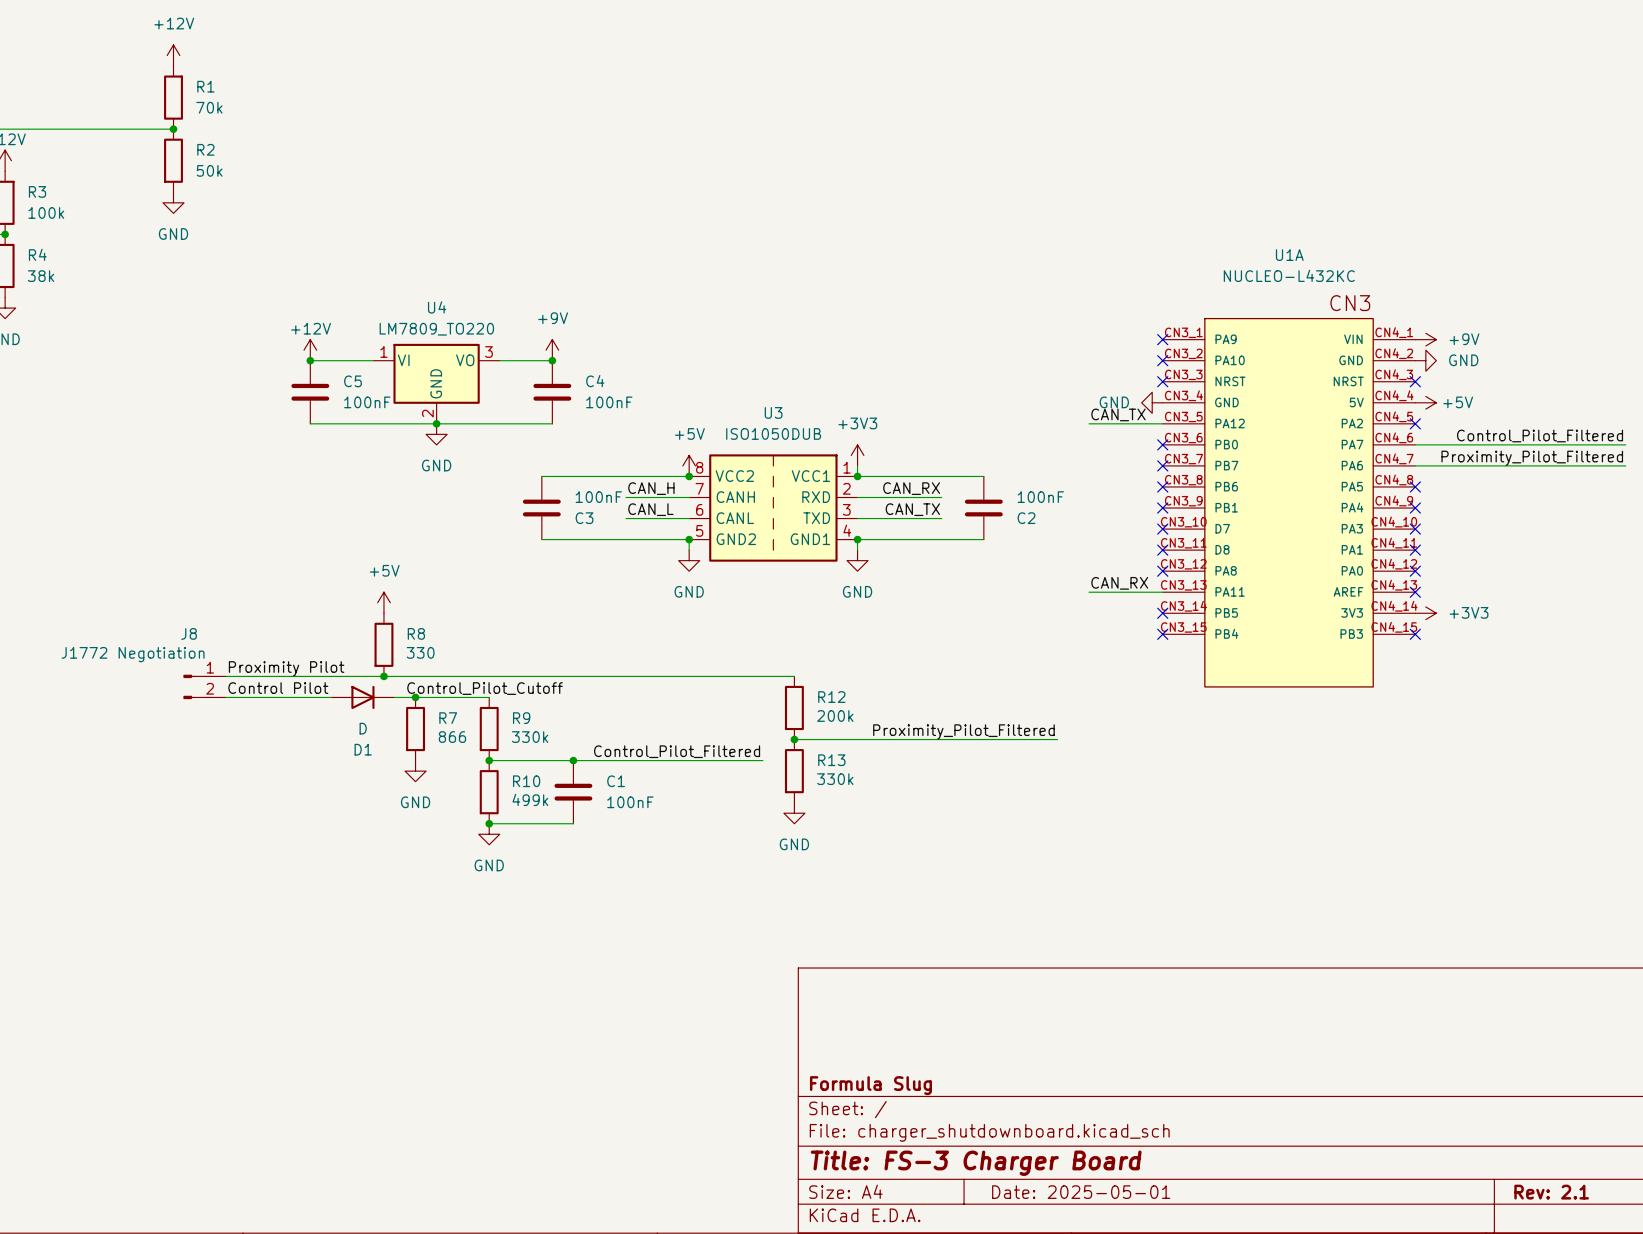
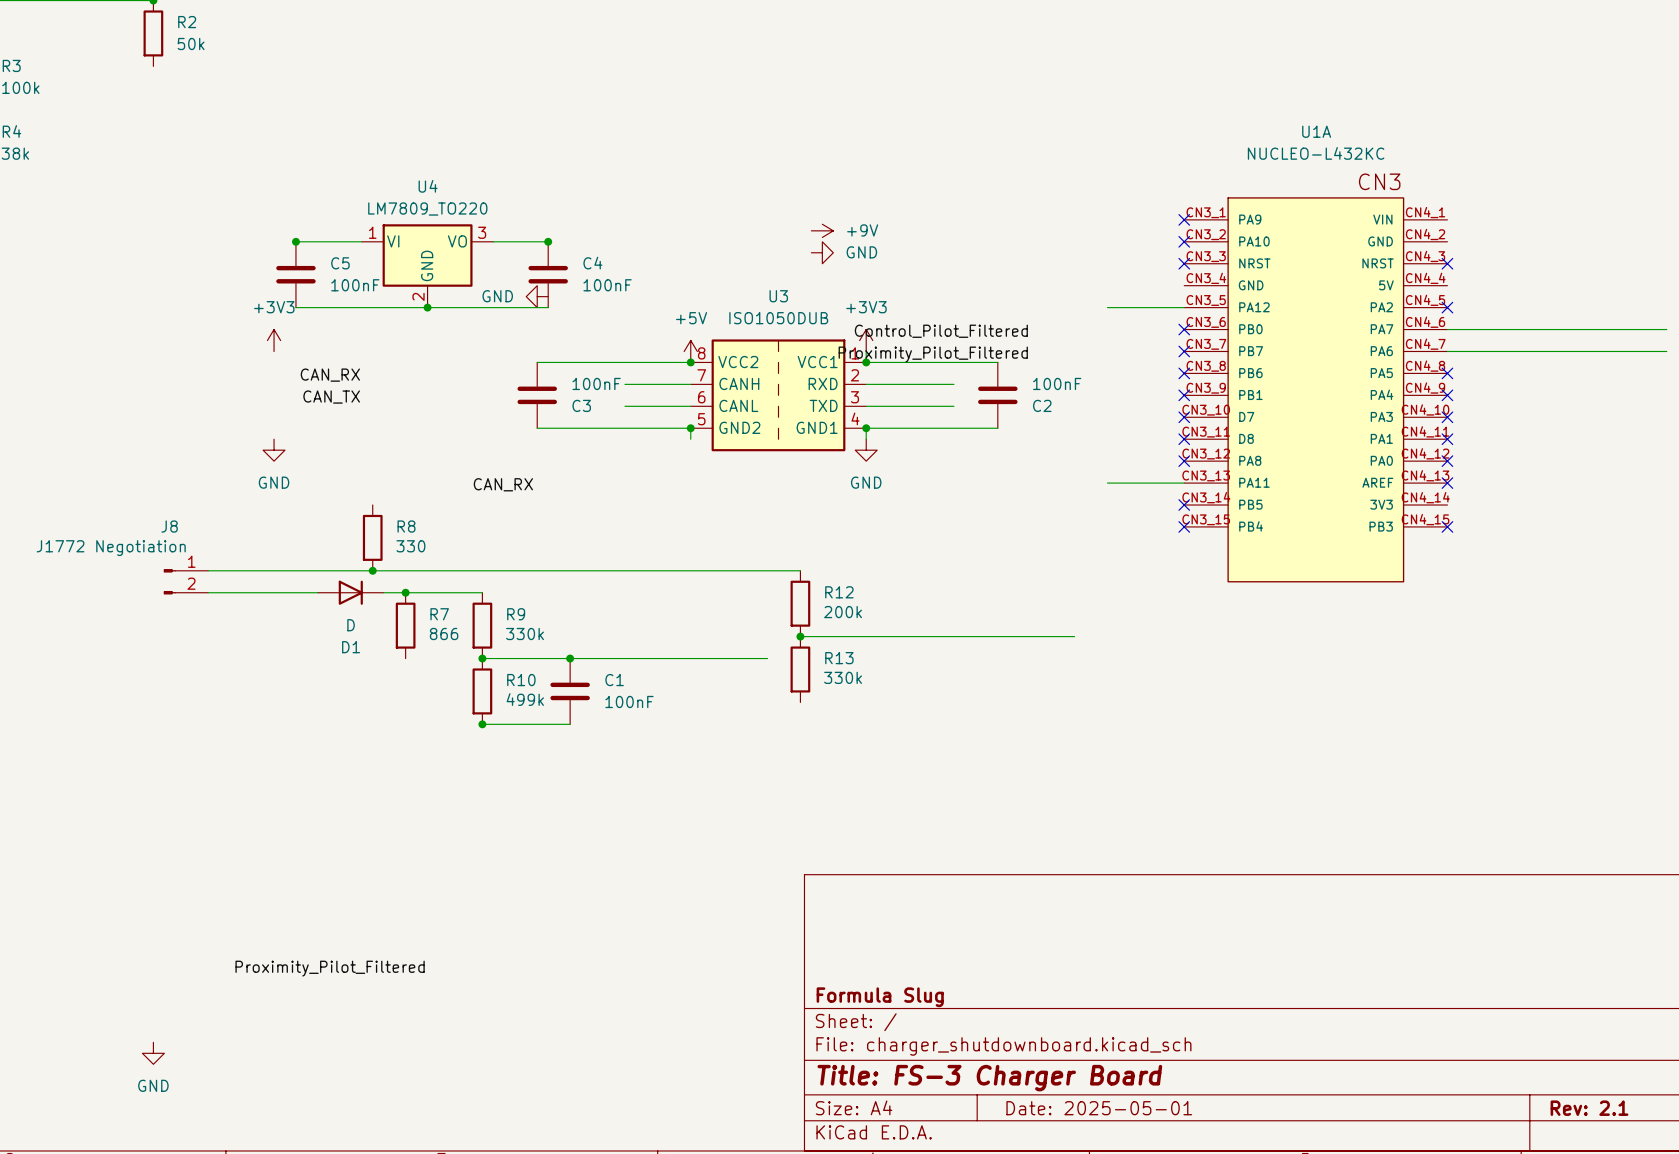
power symbol: GND (173, 202) -> none
power symbol: +9V (1425, 339) -> none
power symbol: +12V (310, 350) -> none
power symbol: +9V (552, 350) -> none
power symbol: none -> +9V (822, 230)
power symbol: GND (1425, 360) -> none
power symbol: none -> GND (822, 252)
power symbol: GND (1152, 402) -> none
power symbol: +5V (1425, 402) -> none
power symbol: none -> GND (537, 296)
label: CAN_TX (1118, 414) -> none
power symbol: GND (436, 434) -> none
label: Control_Pilot_Filtered (1540, 435) -> none
label: none -> Control_Pilot_Filtered (941, 331)
power symbol: none -> +3V3 (274, 340)
label: Proximity_Pilot_Filtered (1532, 458) -> none
label: none -> Proximity_Pilot_Filtered (933, 354)
label: none -> CAN_RX (330, 375)
label: CAN_H (651, 488) -> none
label: CAN_RX (911, 488) -> none
label: none -> CAN_TX (331, 397)
label: CAN_L (650, 509) -> none
label: CAN_TX (912, 509) -> none
power symbol: none -> GND (274, 450)
power symbol: GND (689, 560) -> none
label: CAN_RX (1119, 583) -> none
label: none -> CAN_RX (503, 484)
power symbol: +5V (383, 602) -> none
power symbol: +3V3 (1425, 613) -> none
label: Proximity Pilot (286, 668) -> none
label: Control Pilot (278, 688) -> none
label: Control_Pilot_Cutoff (485, 688) -> none
label: Proximity_Pilot_Filtered (963, 731) -> none
label: Control_Pilot_Filtered (677, 751) -> none
power symbol: GND (415, 771) -> none
power symbol: GND (794, 813) -> none
power symbol: GND (489, 834) -> none
label: none -> Proximity_Pilot_Filtered (330, 968)
power symbol: none -> GND (153, 1053)

